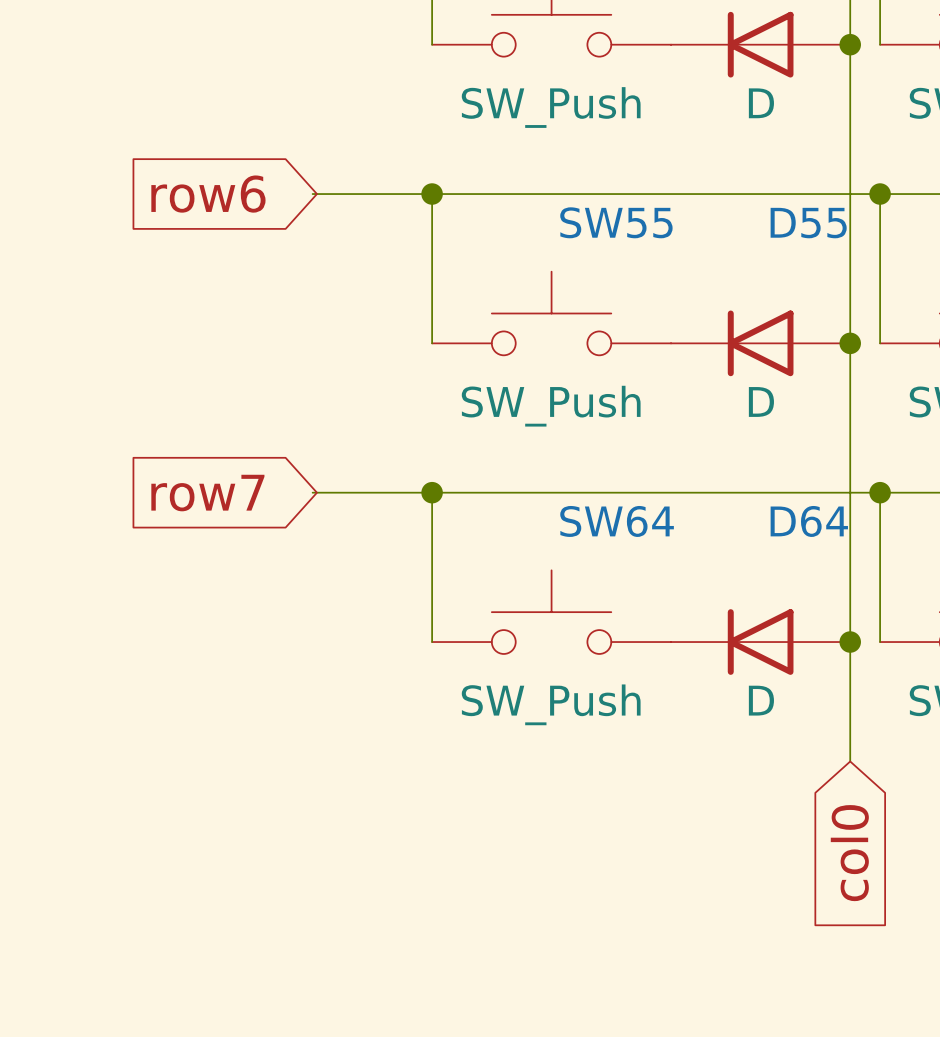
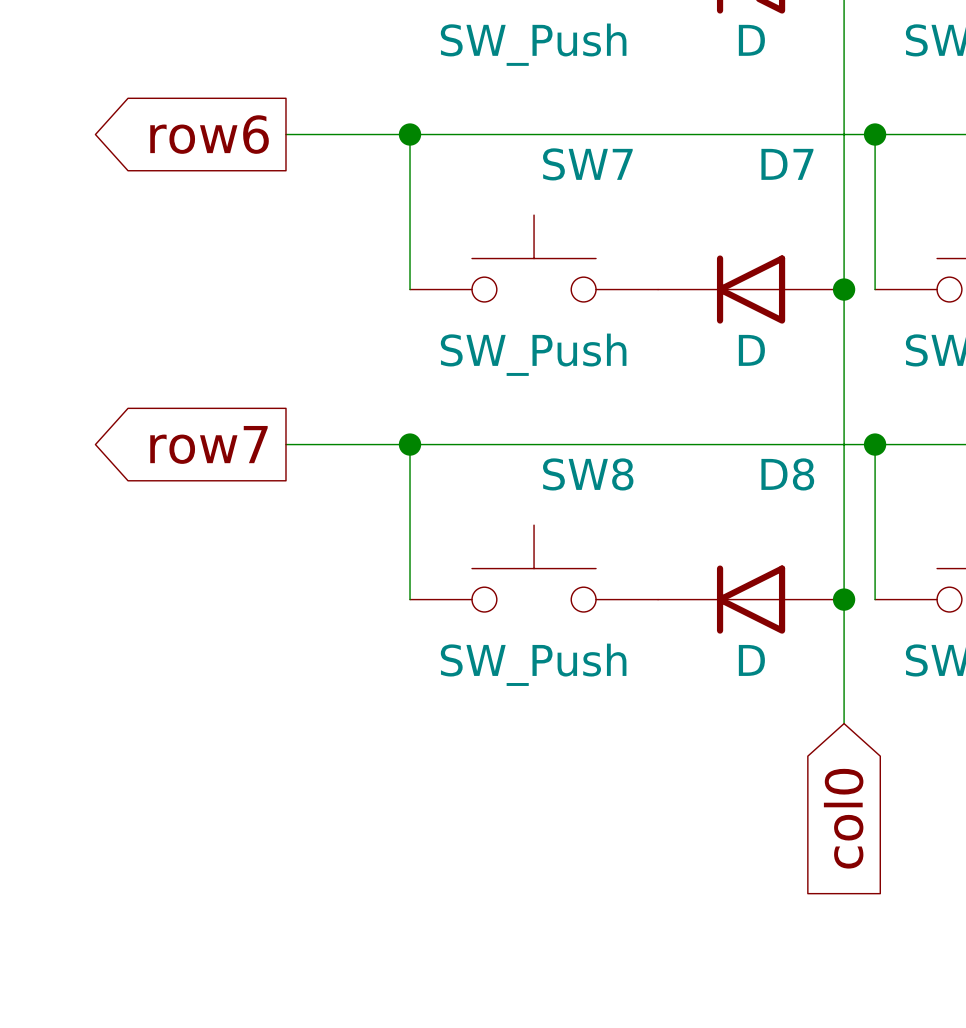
global label rotation: 0° (208, 194) -> 180° (209, 134)
SW55 name: SW55 (616, 222) -> SW7 (587, 164)
D55 name: D55 (808, 223) -> D7 (787, 164)
global label rotation: 0° (207, 493) -> 180° (208, 444)
SW64 name: SW64 (617, 521) -> SW8 (588, 474)
D64 name: D64 (809, 521) -> D8 (787, 474)

